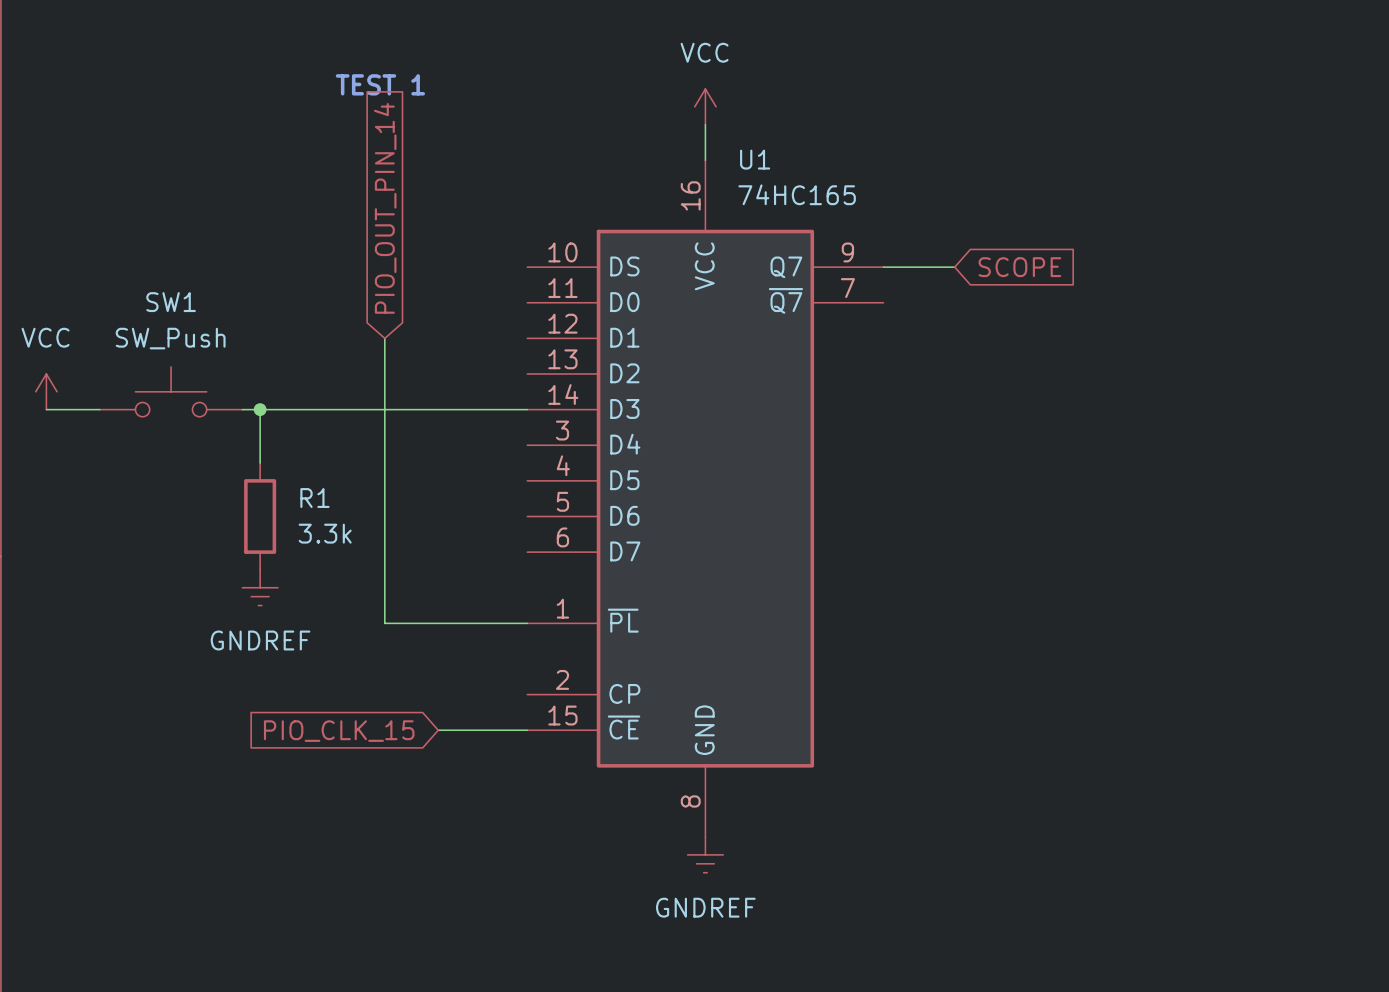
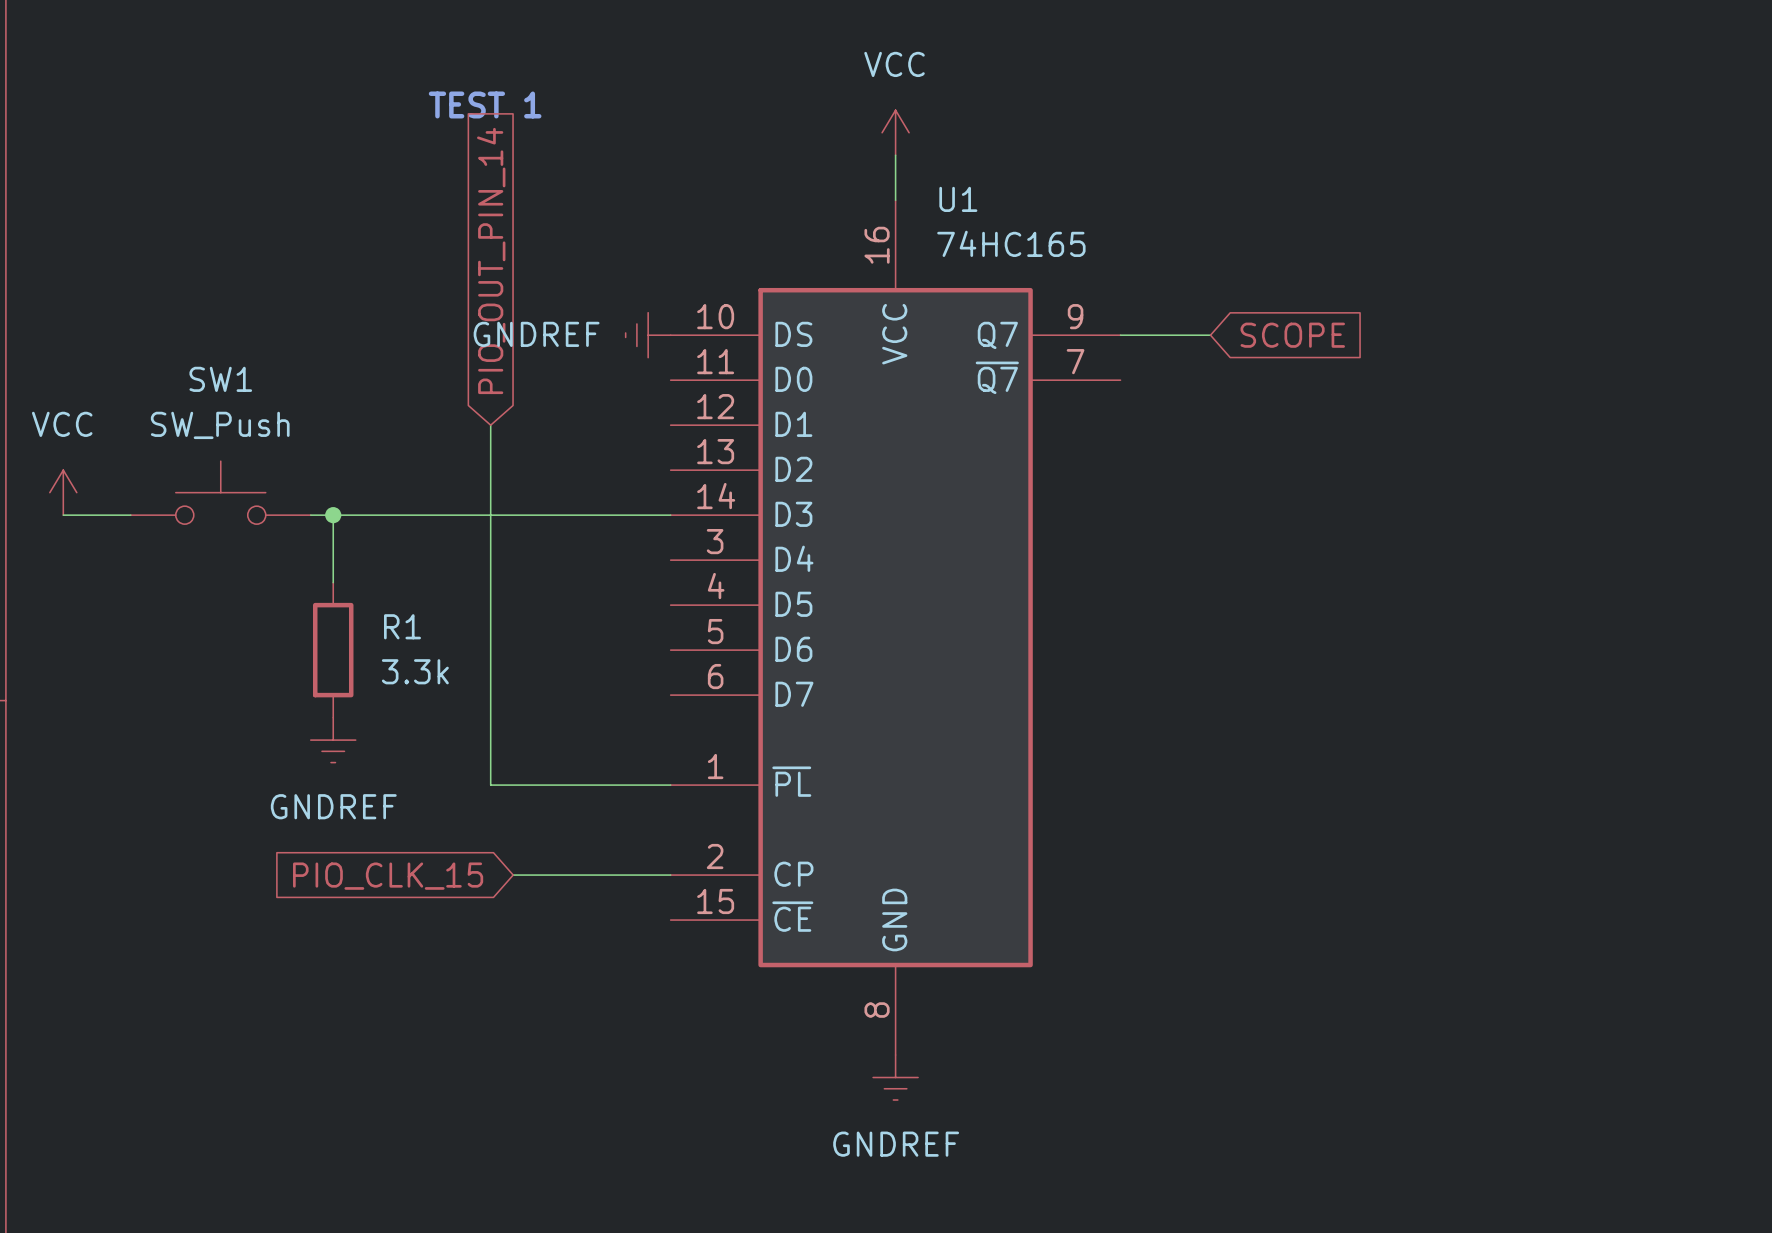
power symbol: none -> GNDREF (648, 335)
wire: none -> (513, 875) (670, 875)
wire: (438, 730) (527, 730) -> none
global label position: PIO_CLK_15 (339, 731) -> PIO_CLK_15 (388, 876)

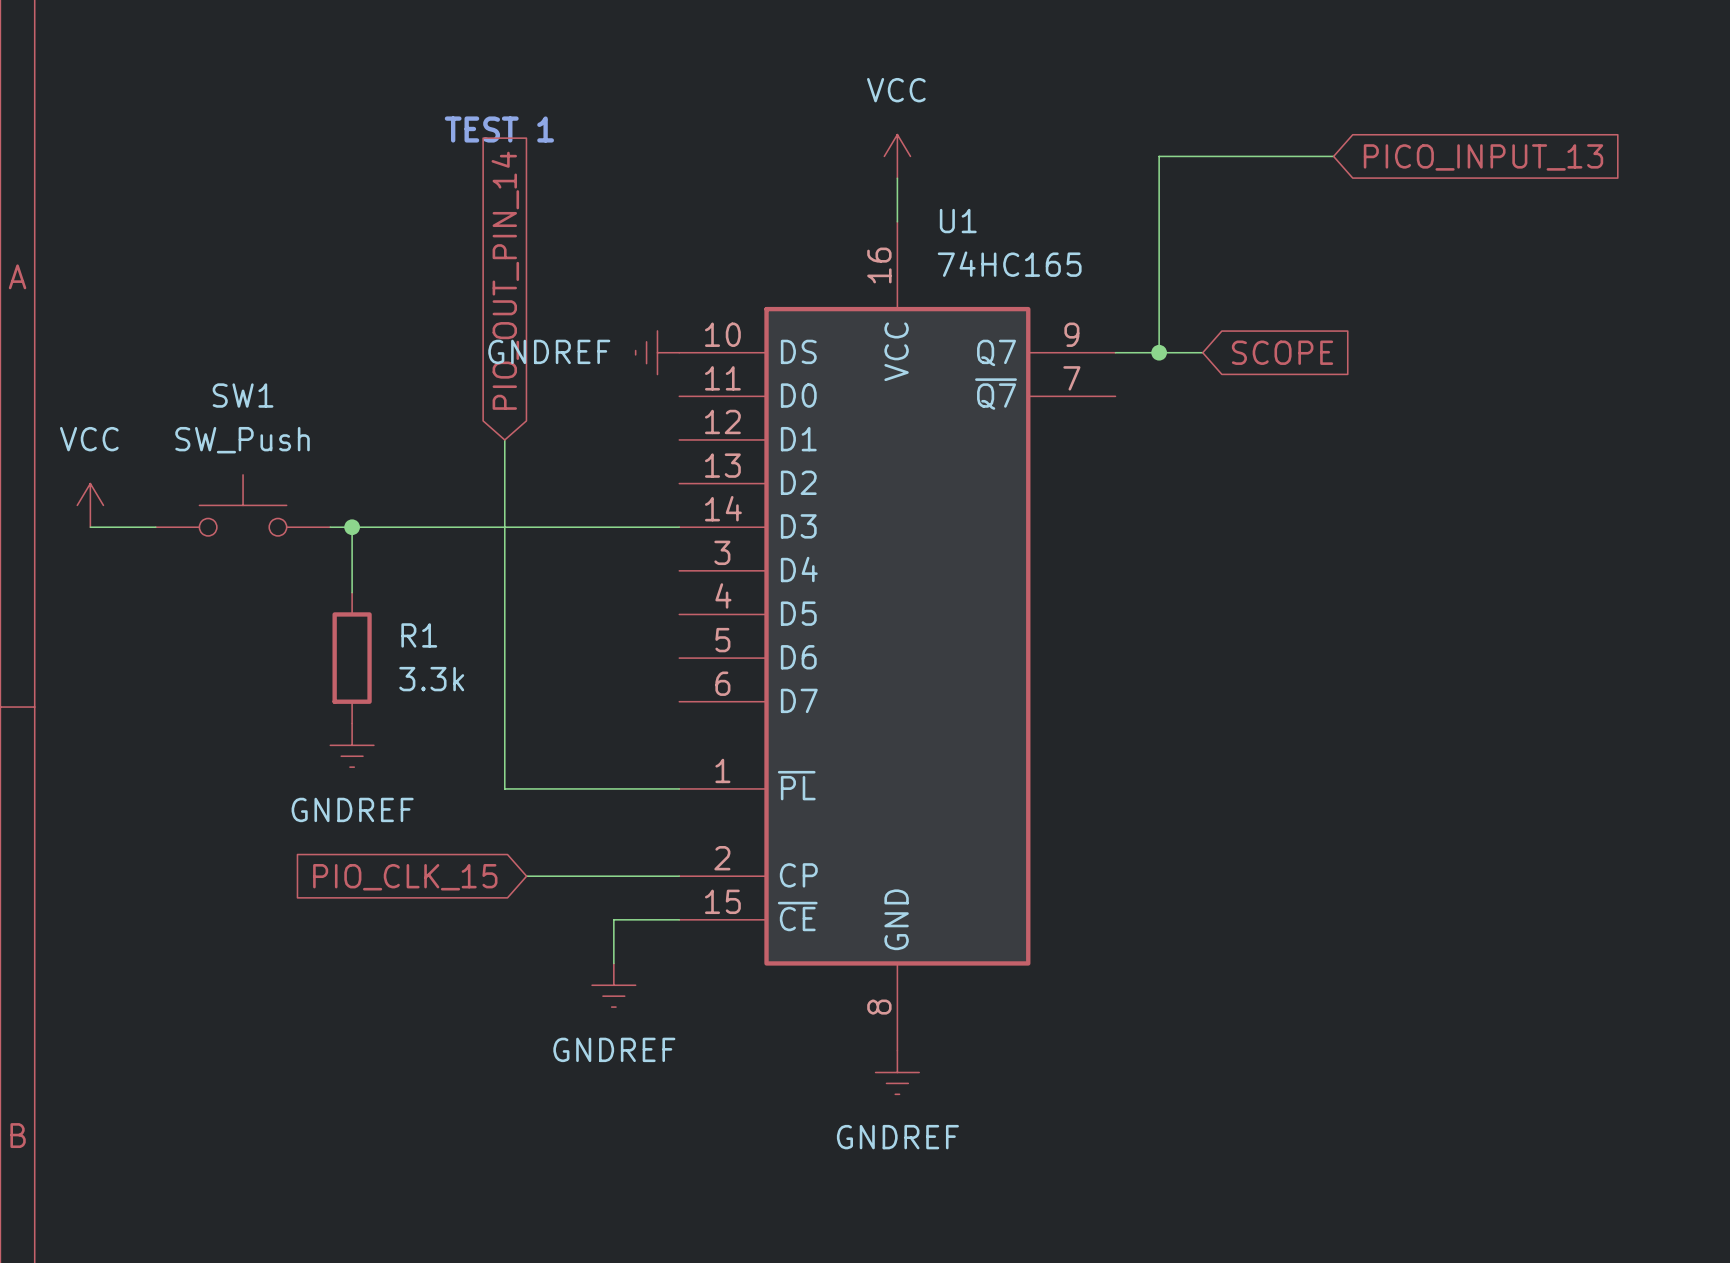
wire: none -> (1333, 156) (1159, 156) (1159, 352)
global label: none -> PICO_INPUT_13 (1483, 157)
junction: none -> (1159, 352)
wire: none -> (679, 919) (613, 919) (613, 963)
power symbol: none -> GNDREF (613, 985)

